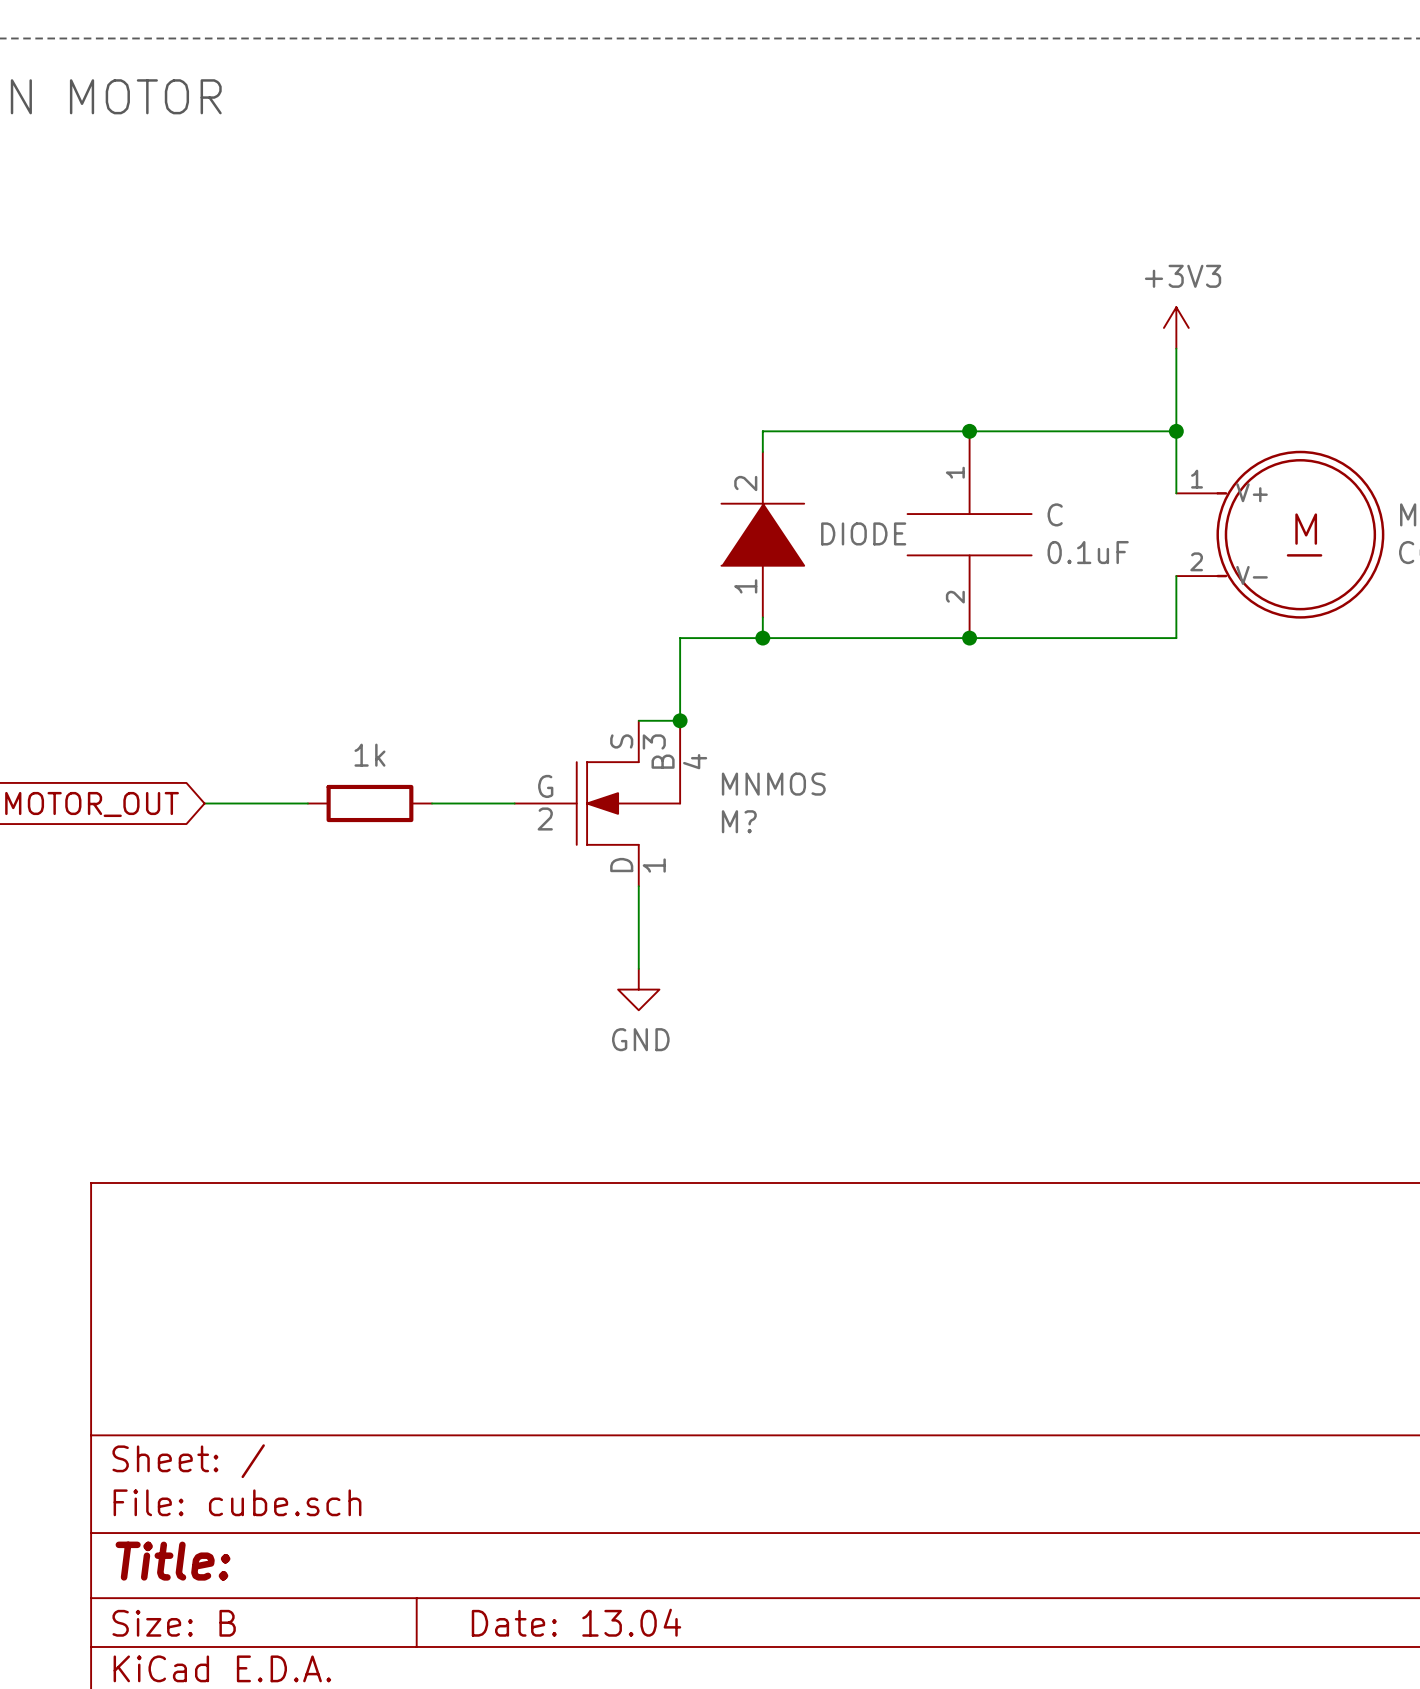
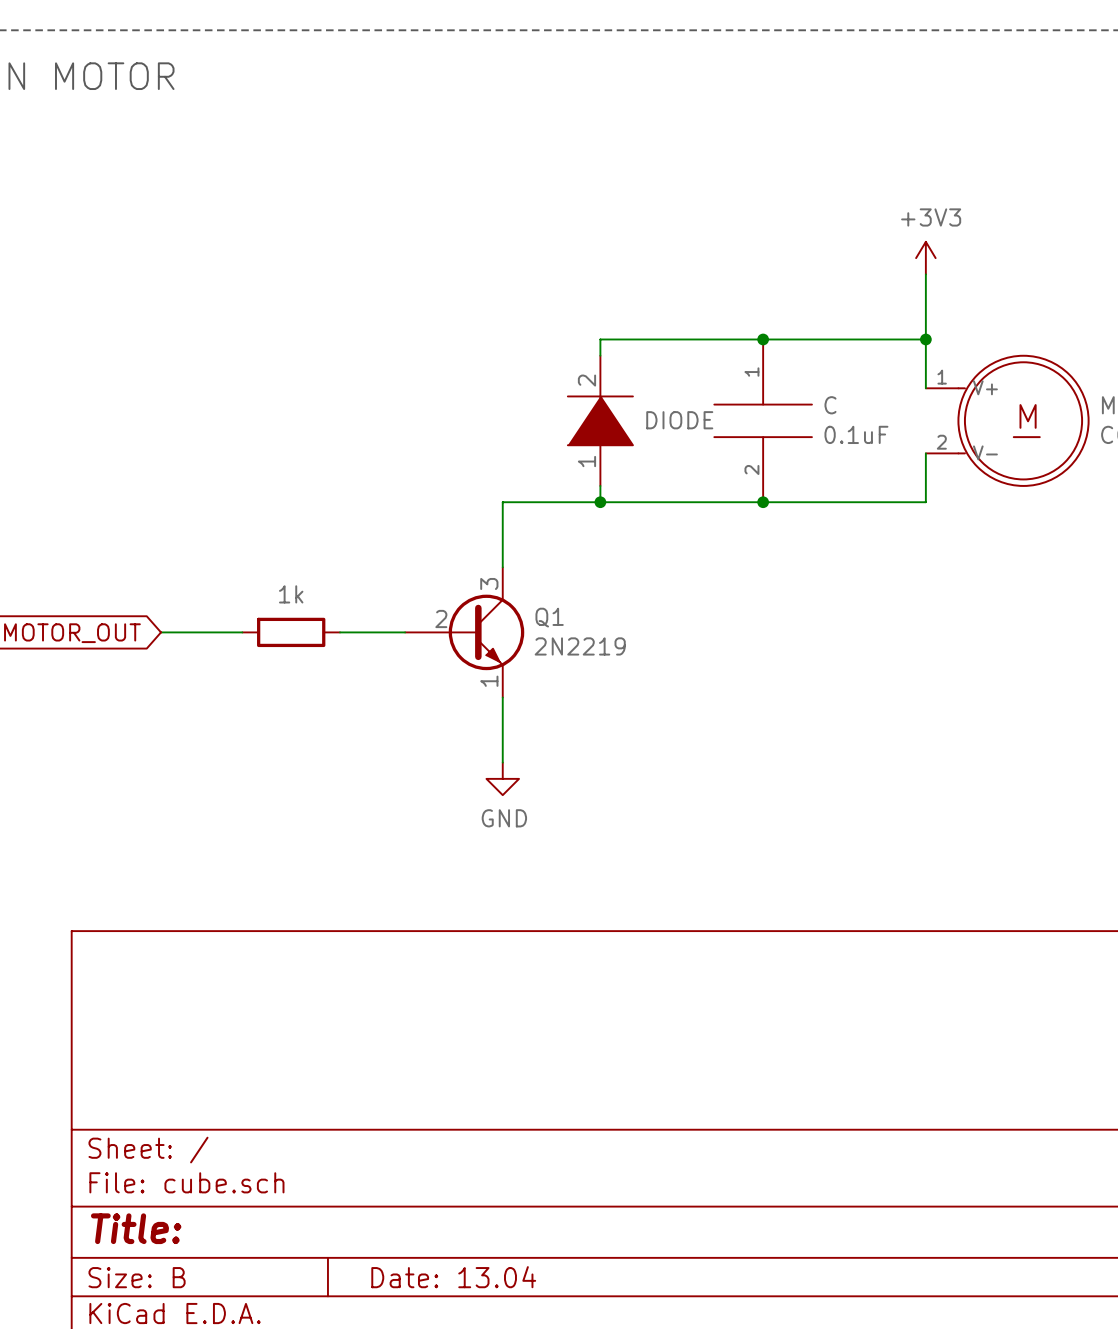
wire: (680, 638) (680, 720) (638, 720) -> (535, 502) (502, 502) (502, 567)
junction: (680, 720) -> none
Q1: none -> 2N2219 (464, 632)
M?: MNMOS (597, 803) -> none

